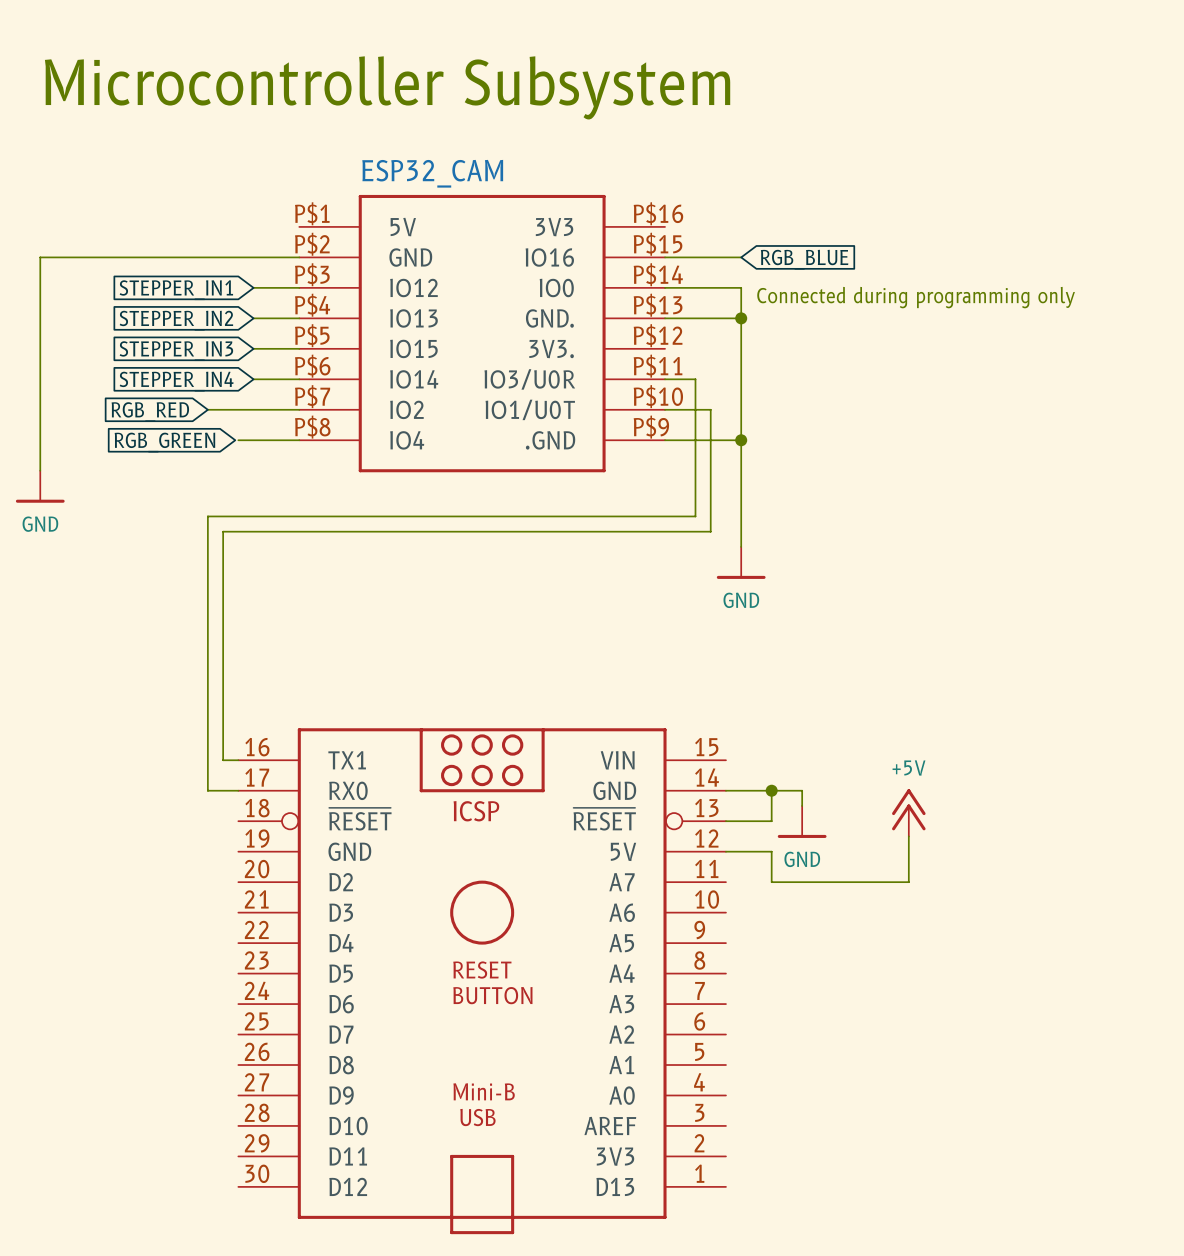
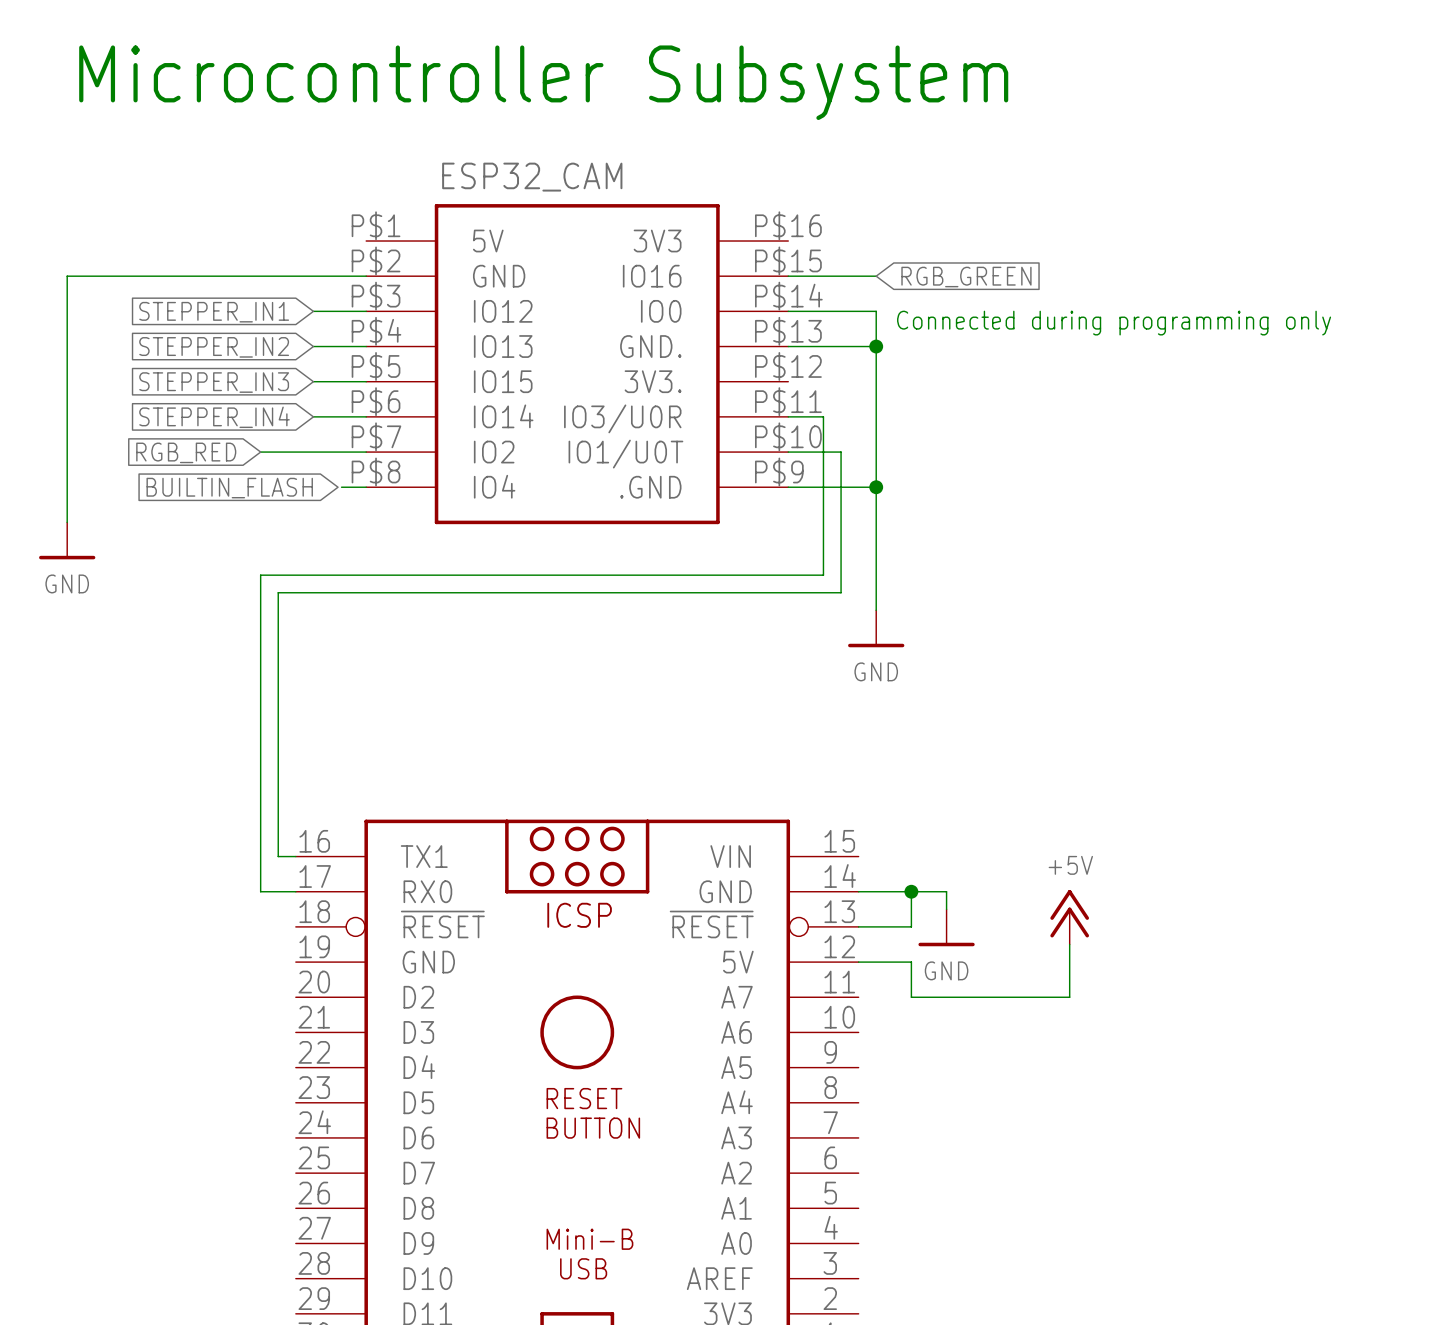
global label: RGB_BLUE (804, 259) -> RGB_GREEN (966, 277)
wire: (238, 440) (277, 440) -> none
global label: RGB_GREEN (164, 442) -> none
global label: none -> BUILTIN_FLASH (229, 488)

